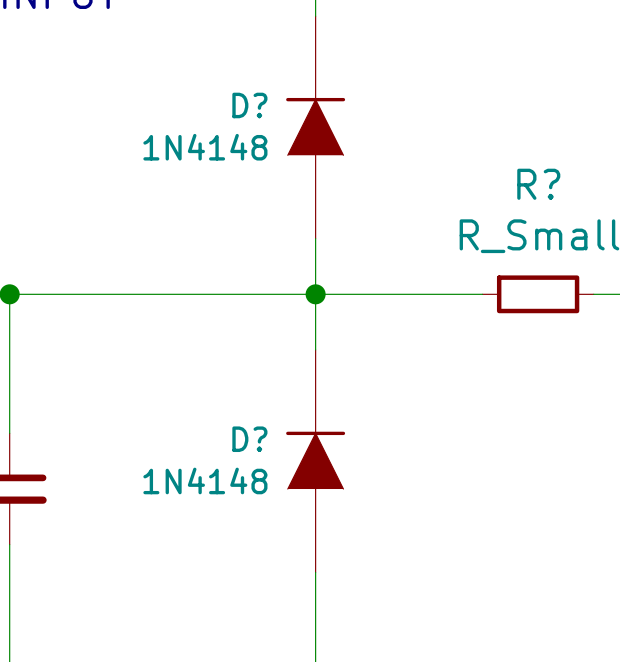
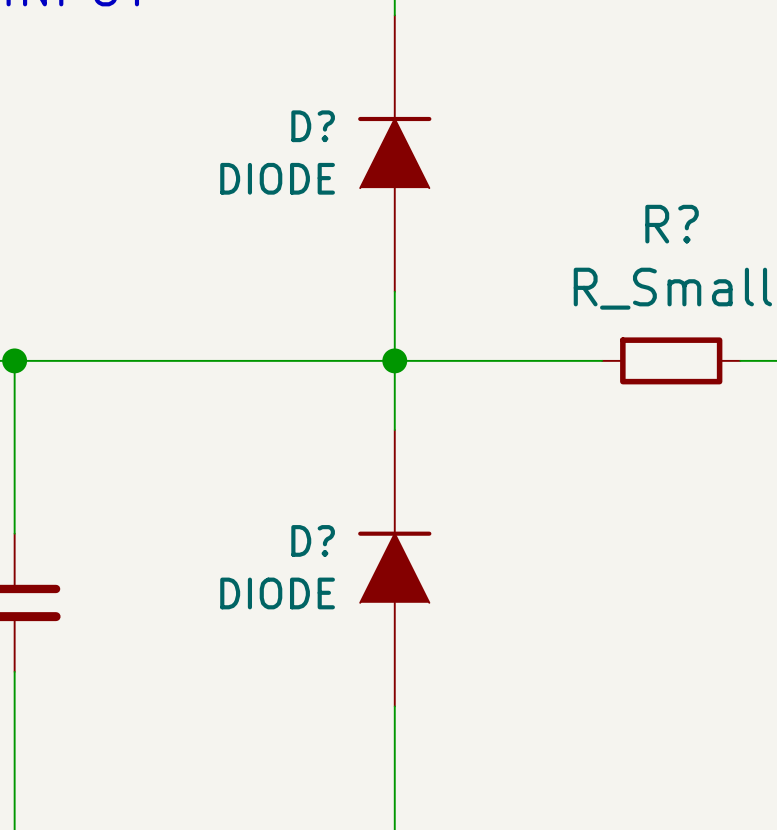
D? value: 1N4148 (205, 147) -> DIODE (277, 178)
D? value: 1N4148 (205, 480) -> DIODE (277, 593)

